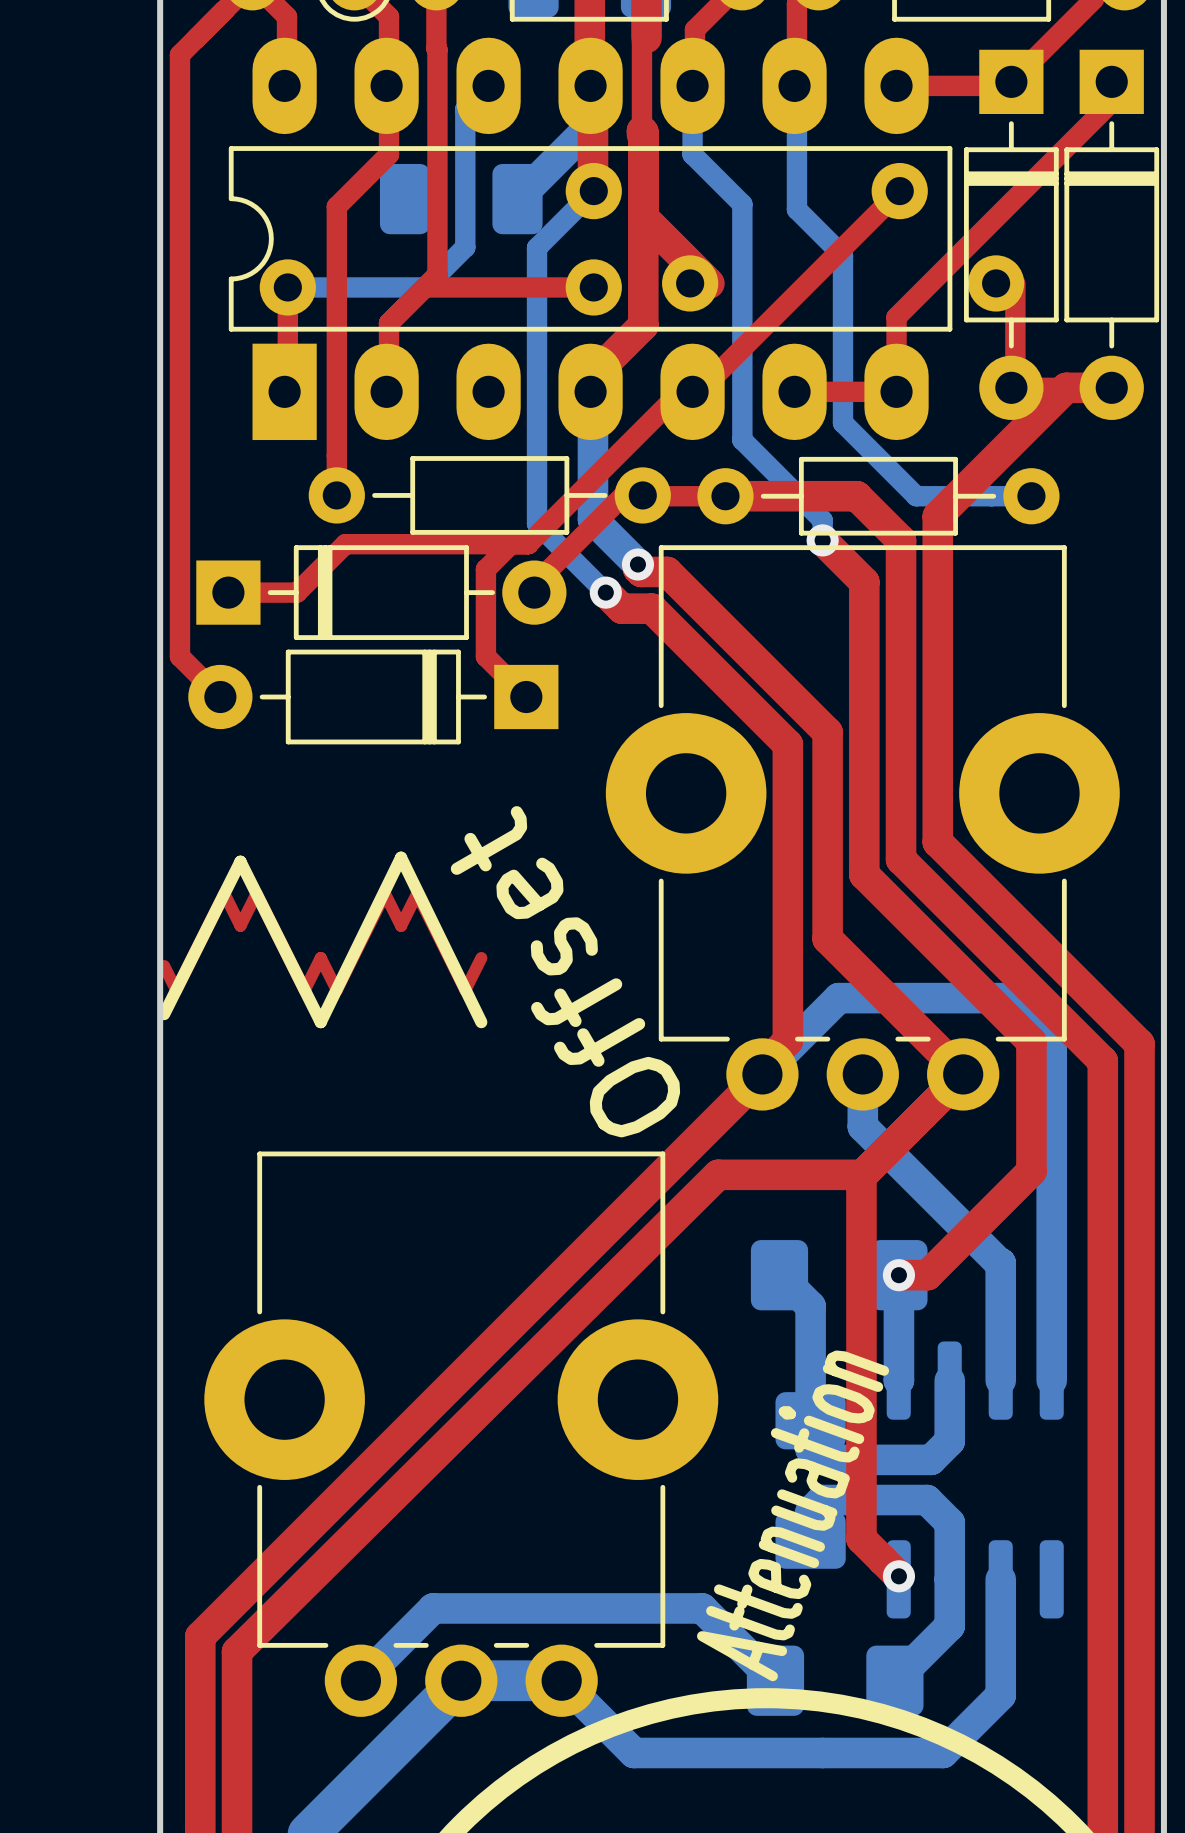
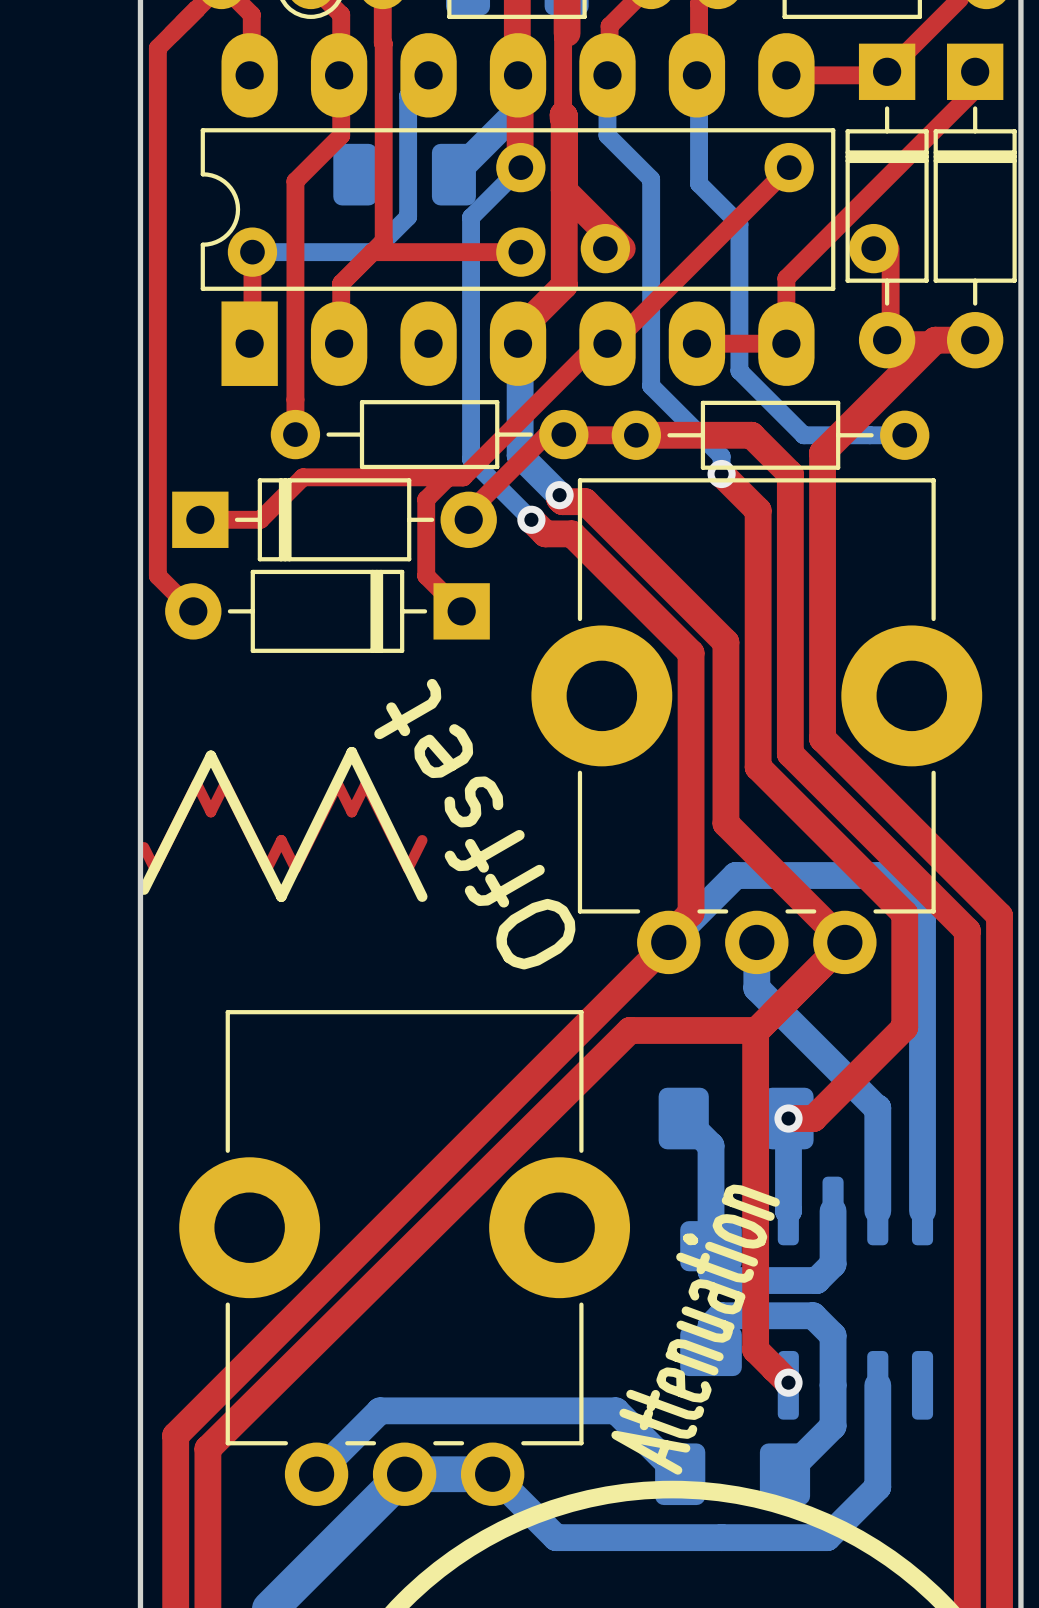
text position: Offset (565, 971) -> Offset (474, 824)

